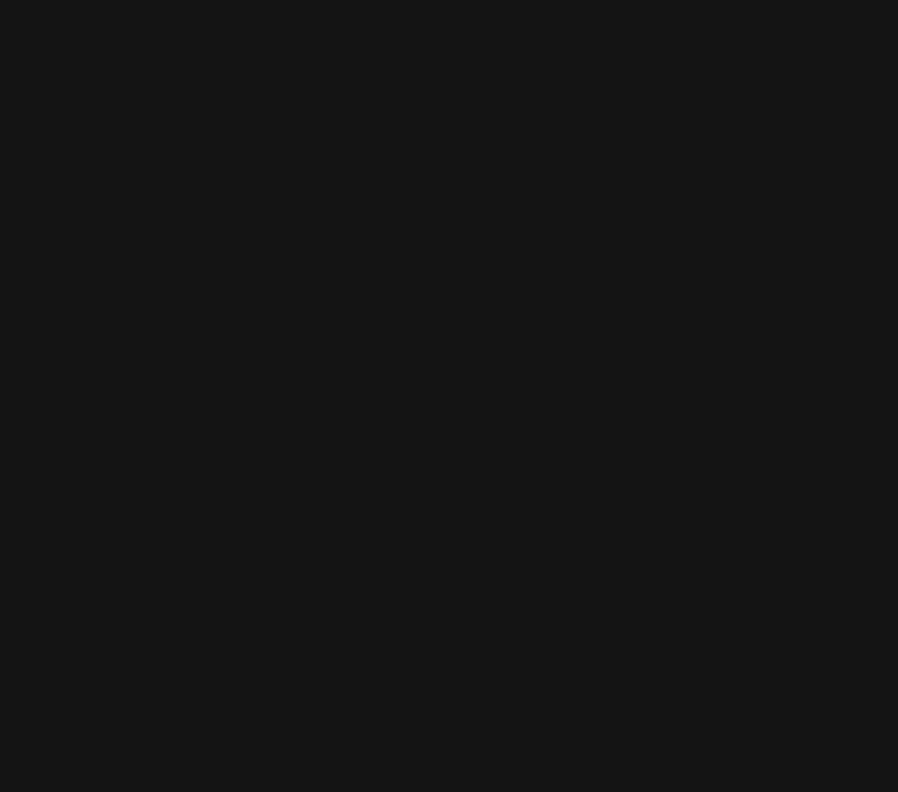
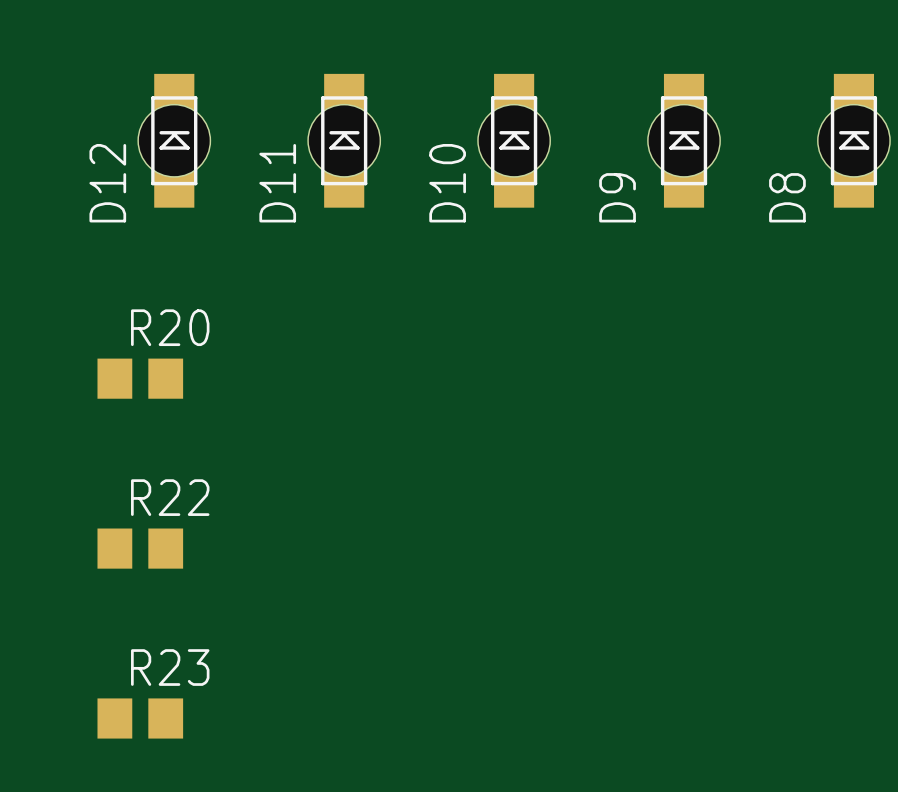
D12: none -> (174, 140)
D11: none -> (344, 140)
D10: none -> (514, 140)
D9: none -> (684, 140)
D8: none -> (853, 140)
R20: none -> (140, 378)
R22: none -> (140, 548)
R23: none -> (140, 718)

